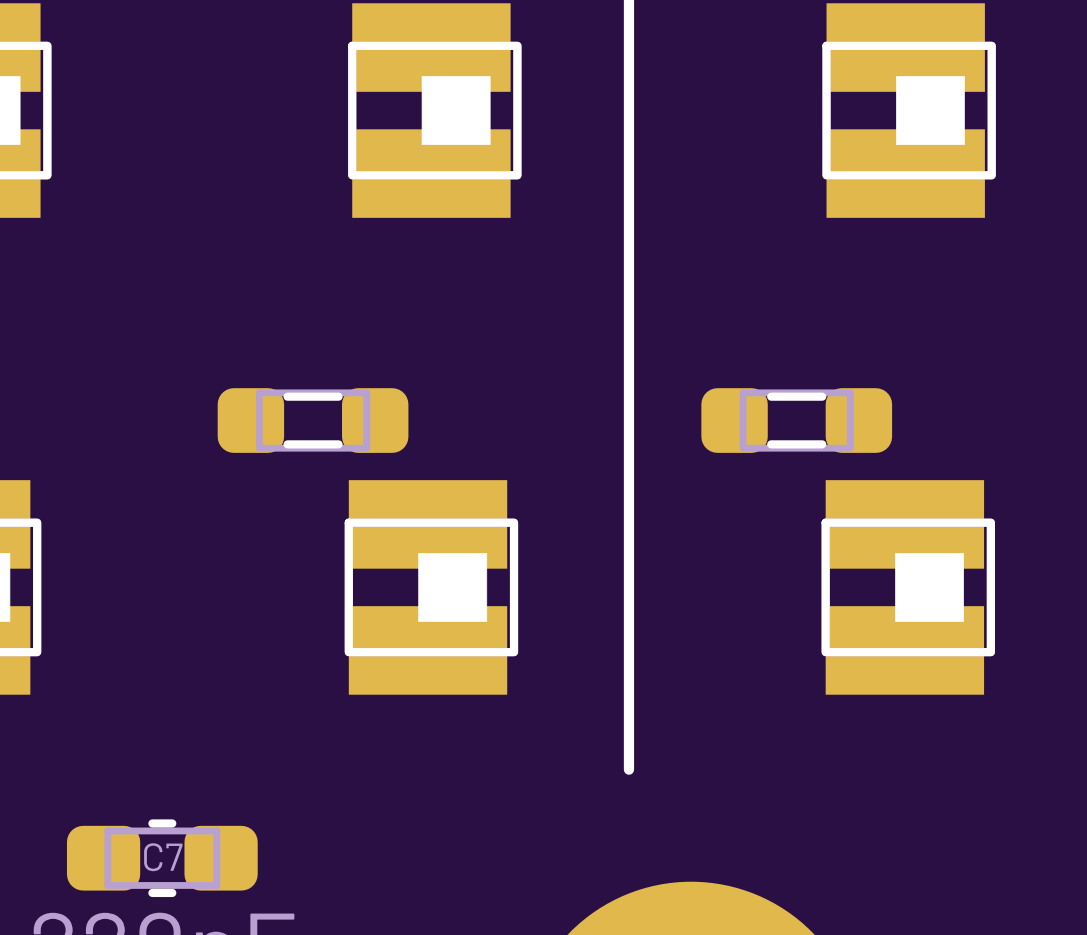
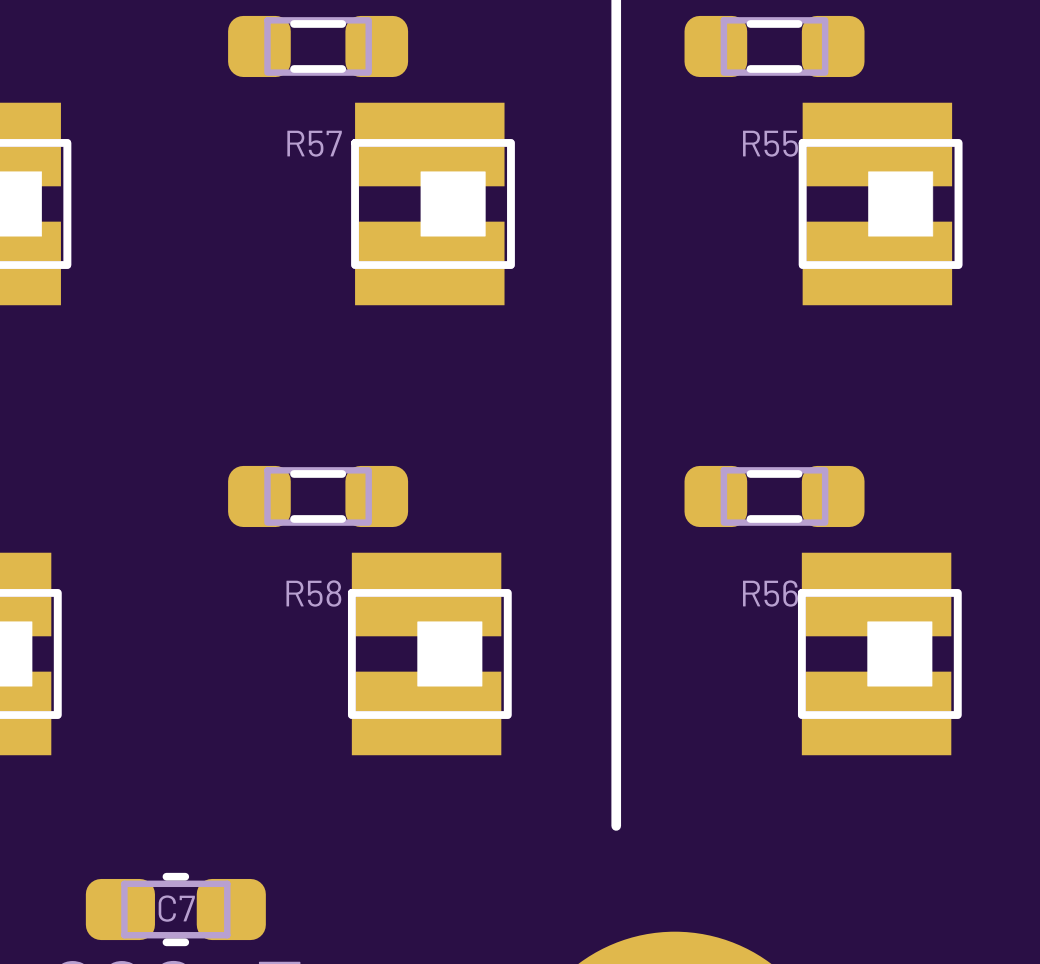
R57 name: none -> R57 (314, 143)
R55 name: none -> R55 (770, 143)
R58 name: none -> R58 (313, 593)
R56 name: none -> R56 (770, 593)

